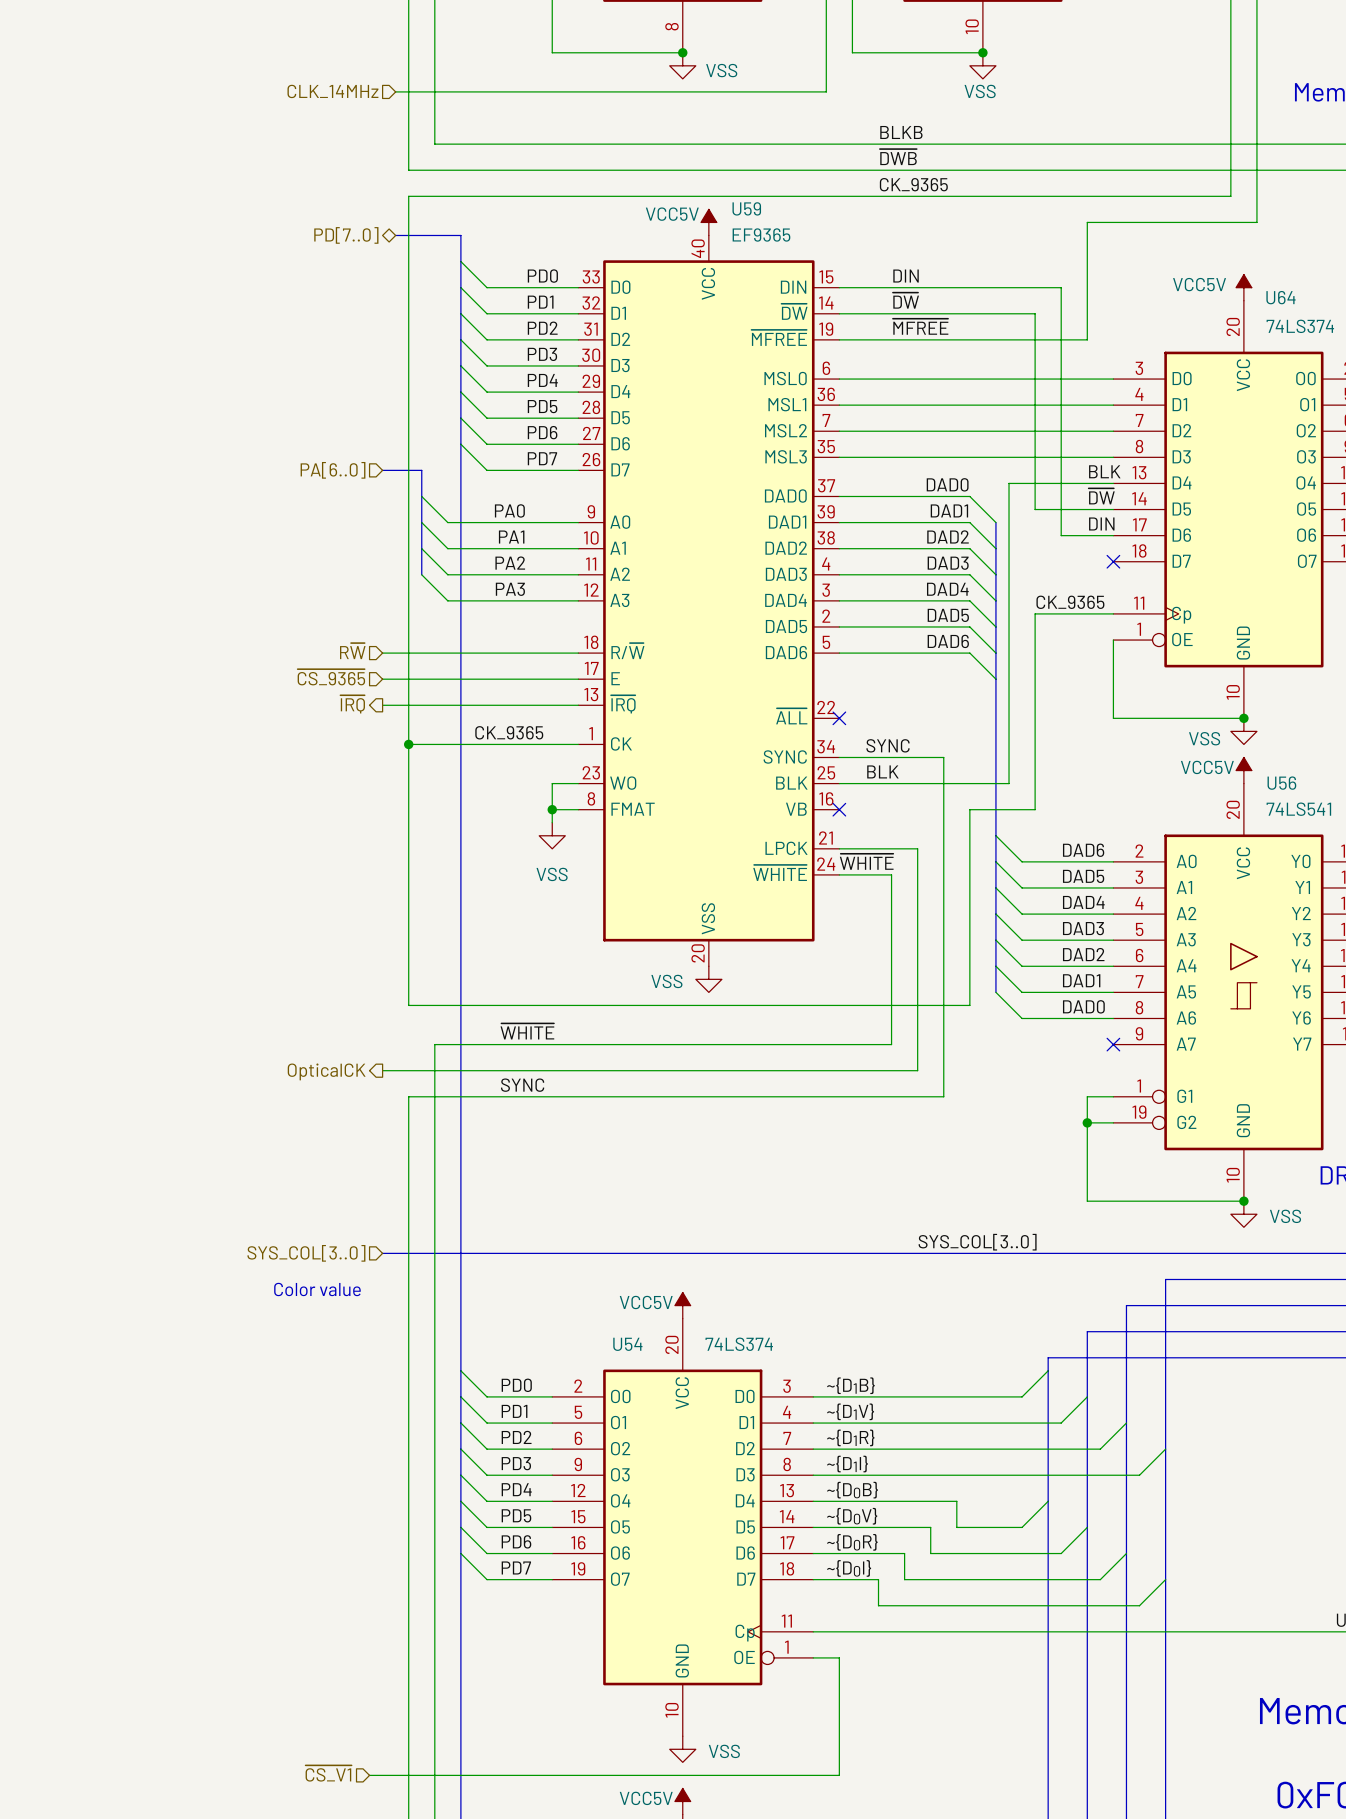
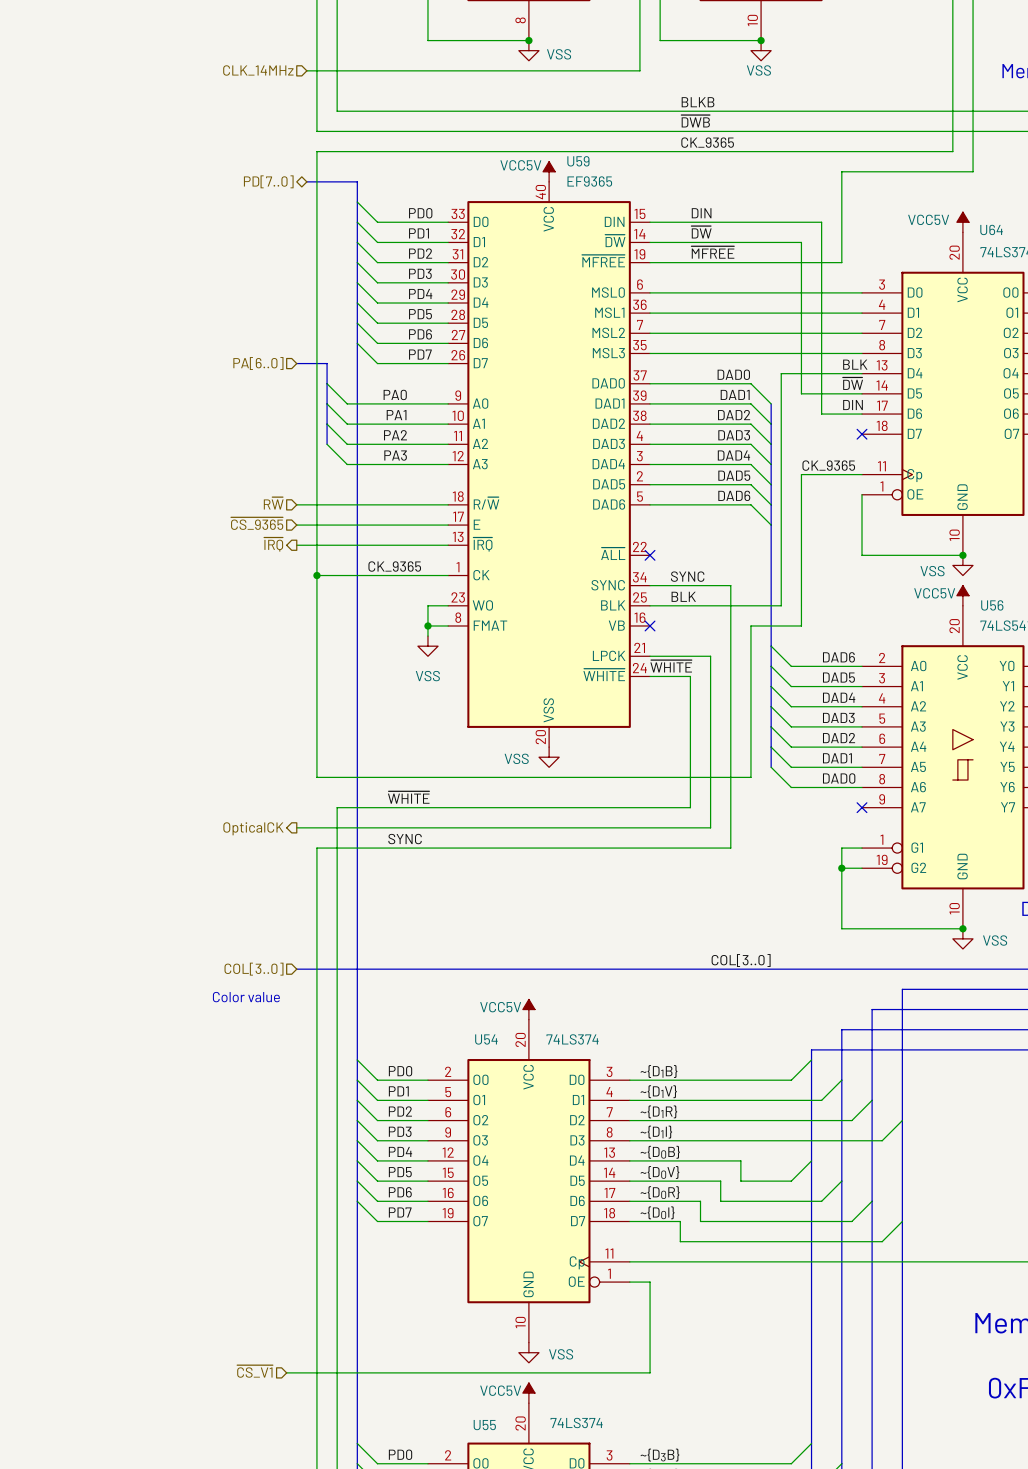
label: SYS_COL[3..0] (977, 1242) -> COL[3..0] (741, 960)
hierarchical label: SYS_COL[3..0] (306, 1253) -> COL[3..0] (254, 969)

